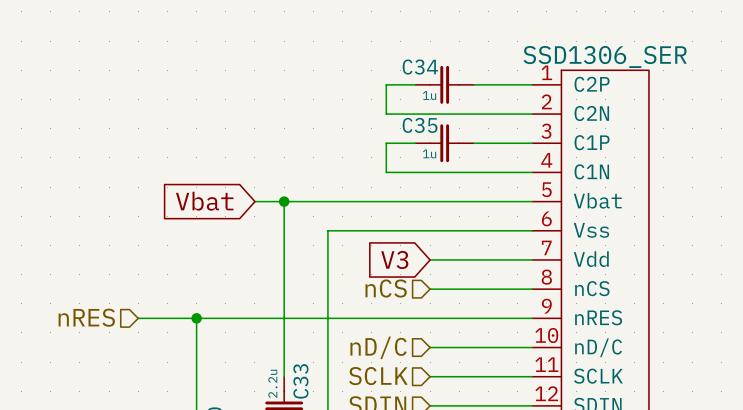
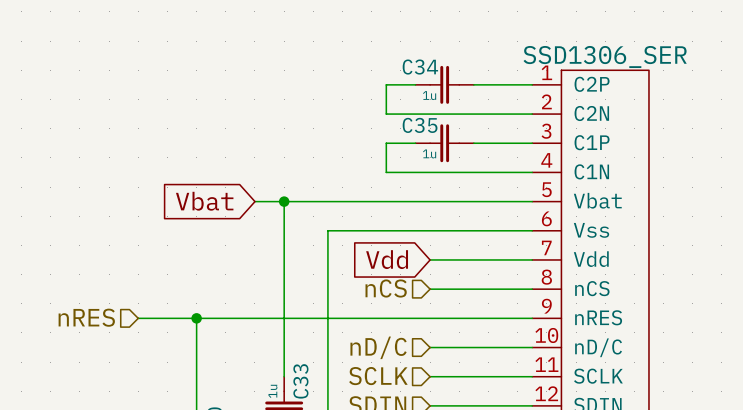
global label: V3 (394, 259) -> Vdd (387, 259)
C33 value: 2.2u (272, 383) -> 1u (272, 391)

